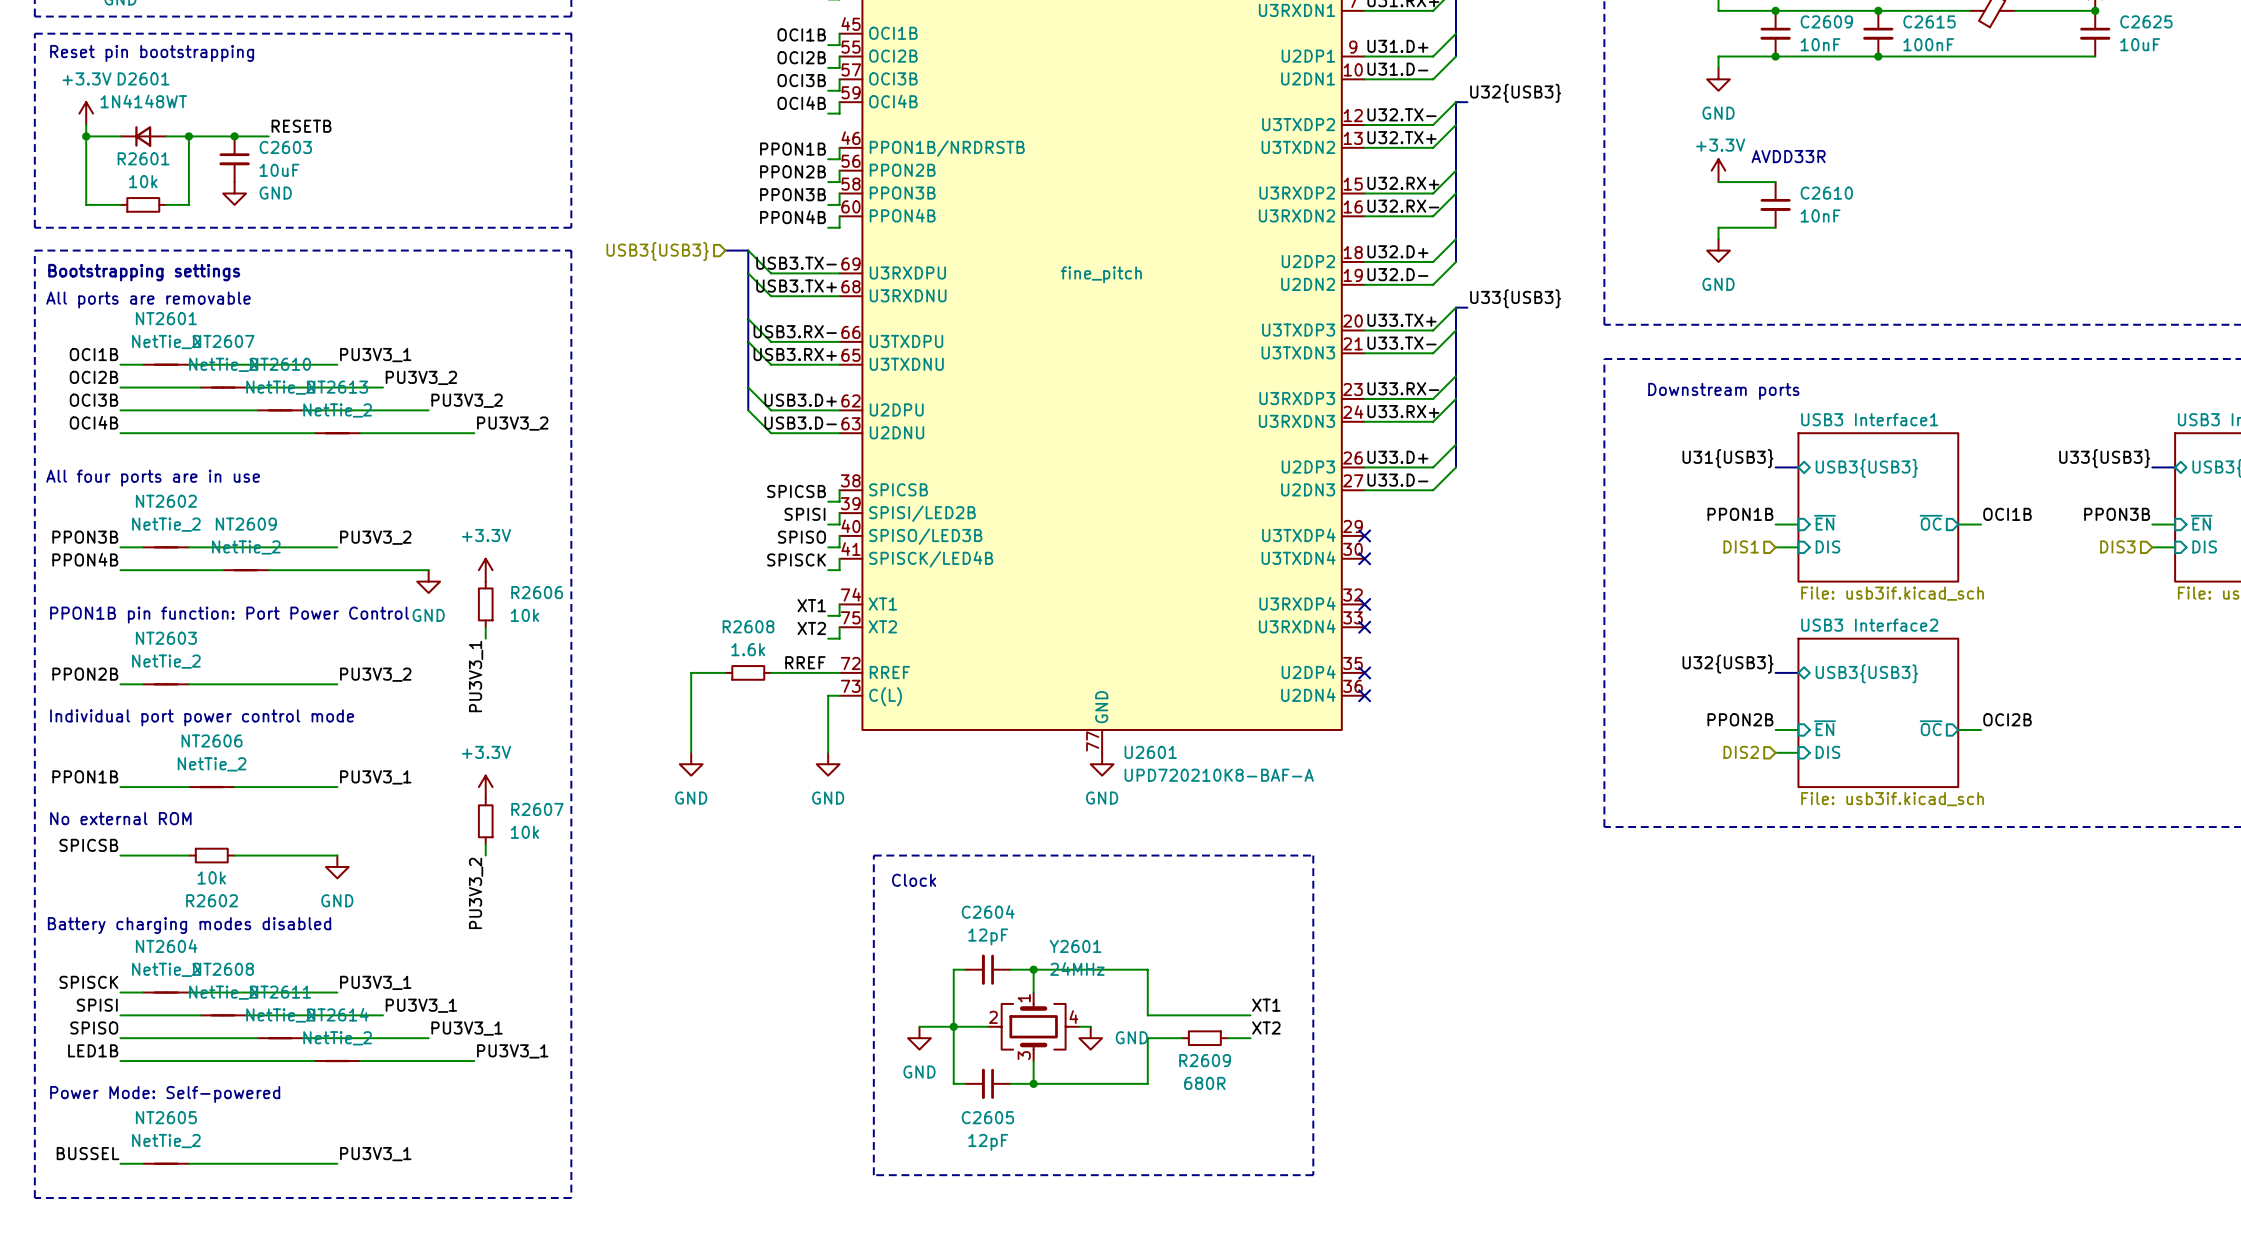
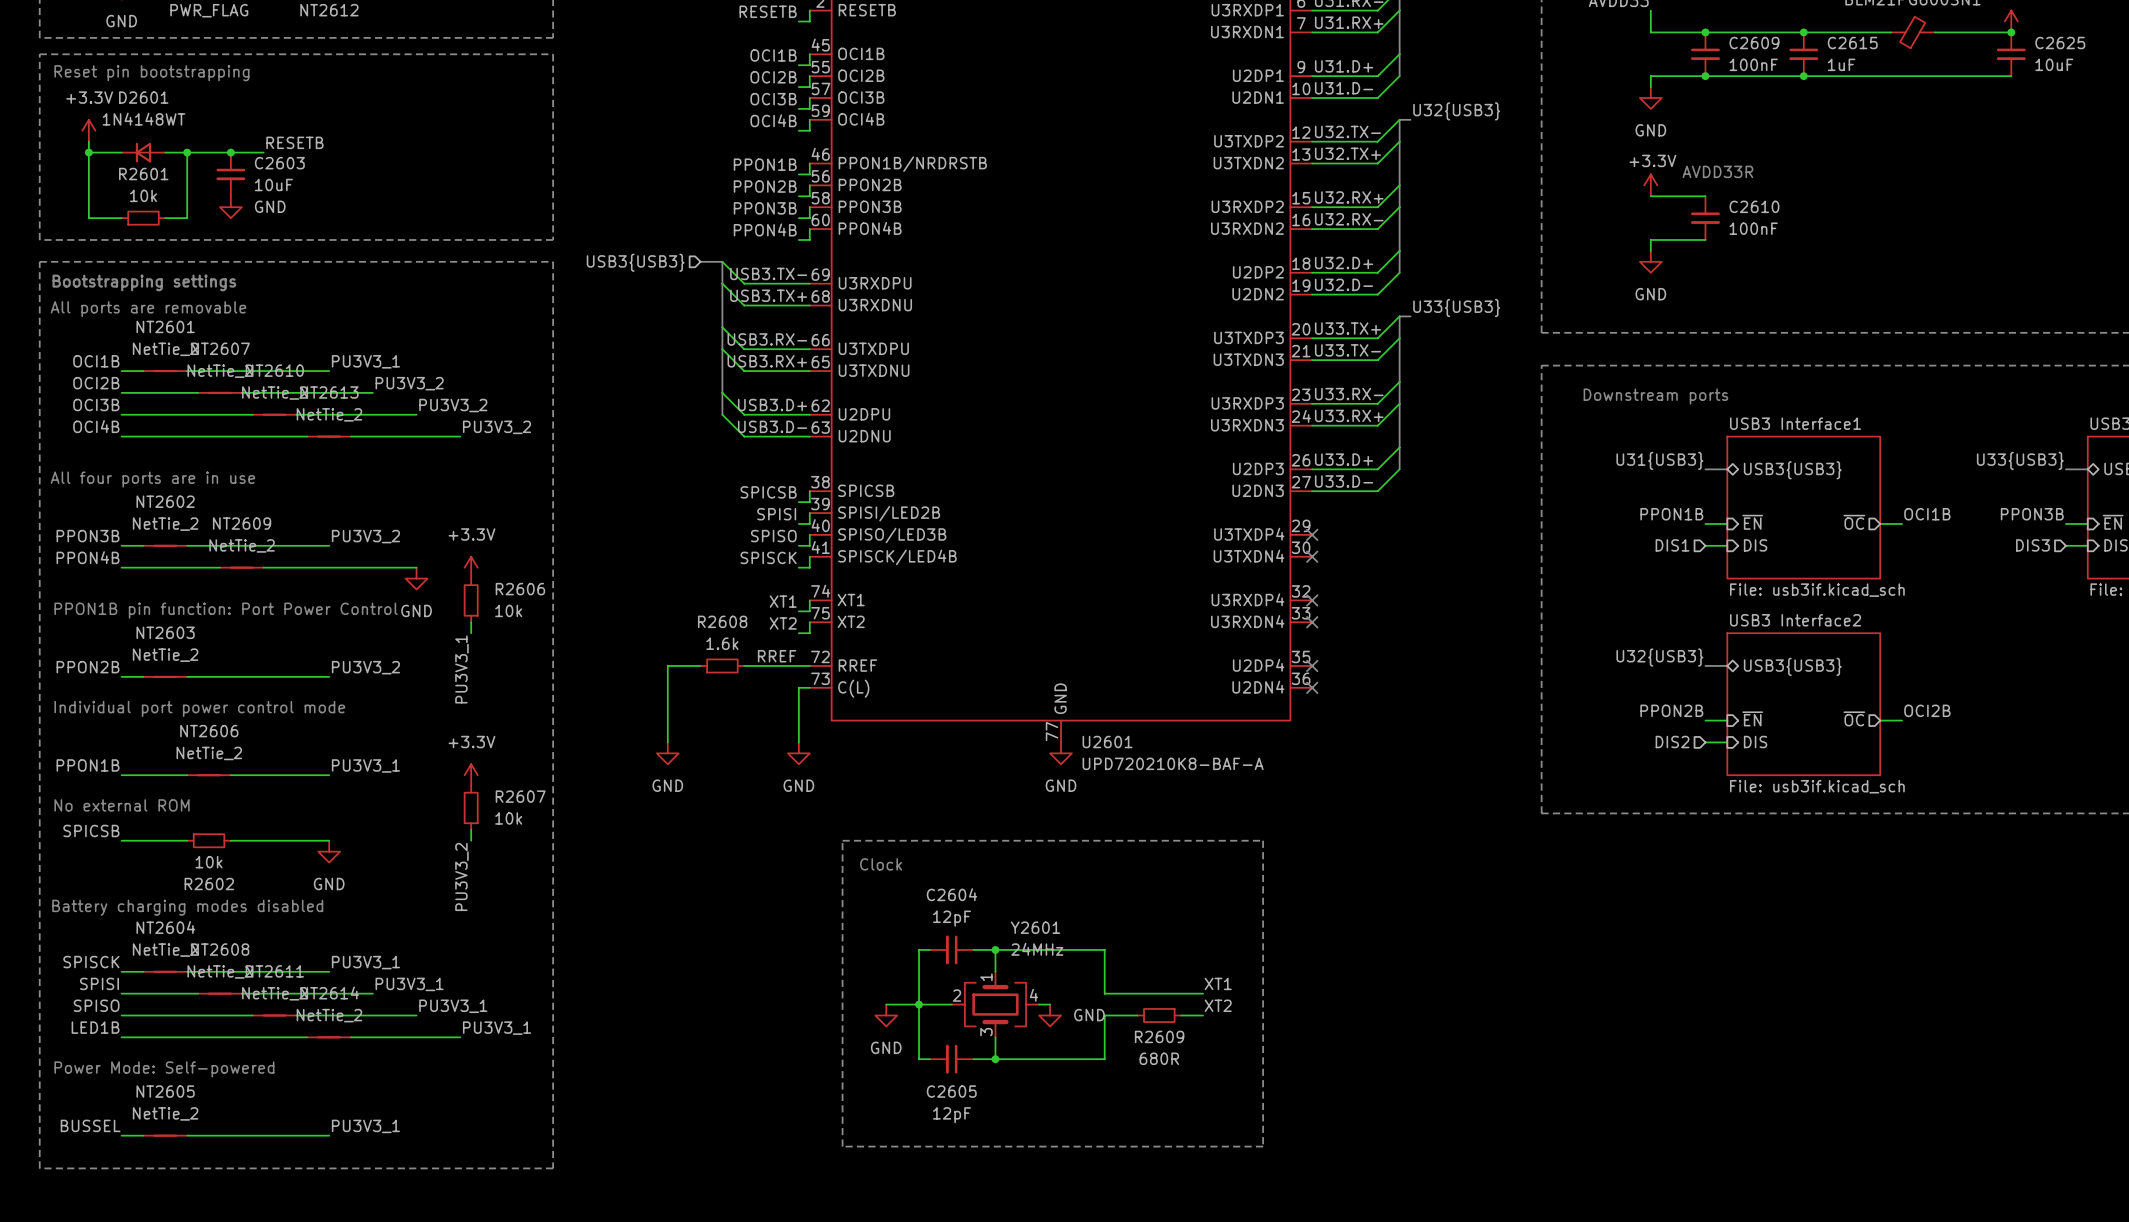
C2609 value: 10nF (1820, 44) -> 100nF (1753, 64)
C2615 value: 100nF (1928, 44) -> 1uF (1841, 64)
C2610 value: 10nF (1820, 215) -> 100nF (1753, 228)
U2601 text: fine_pitch (1101, 274) -> none

